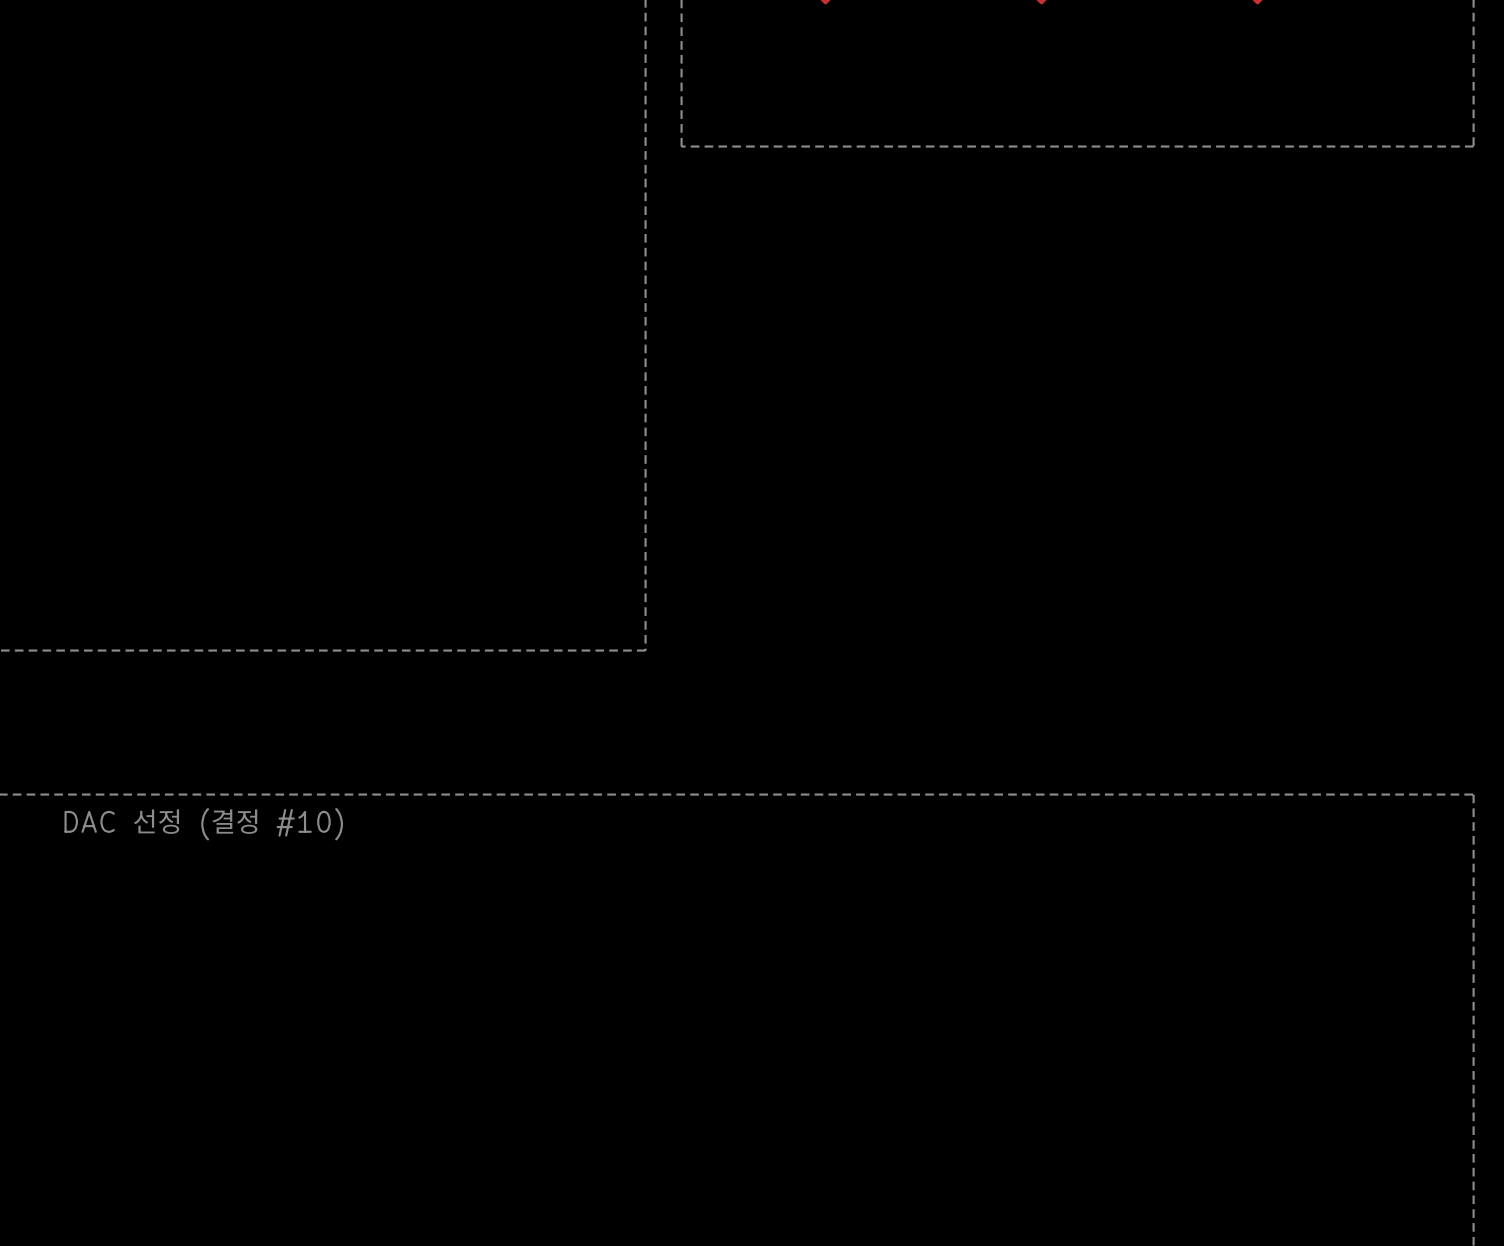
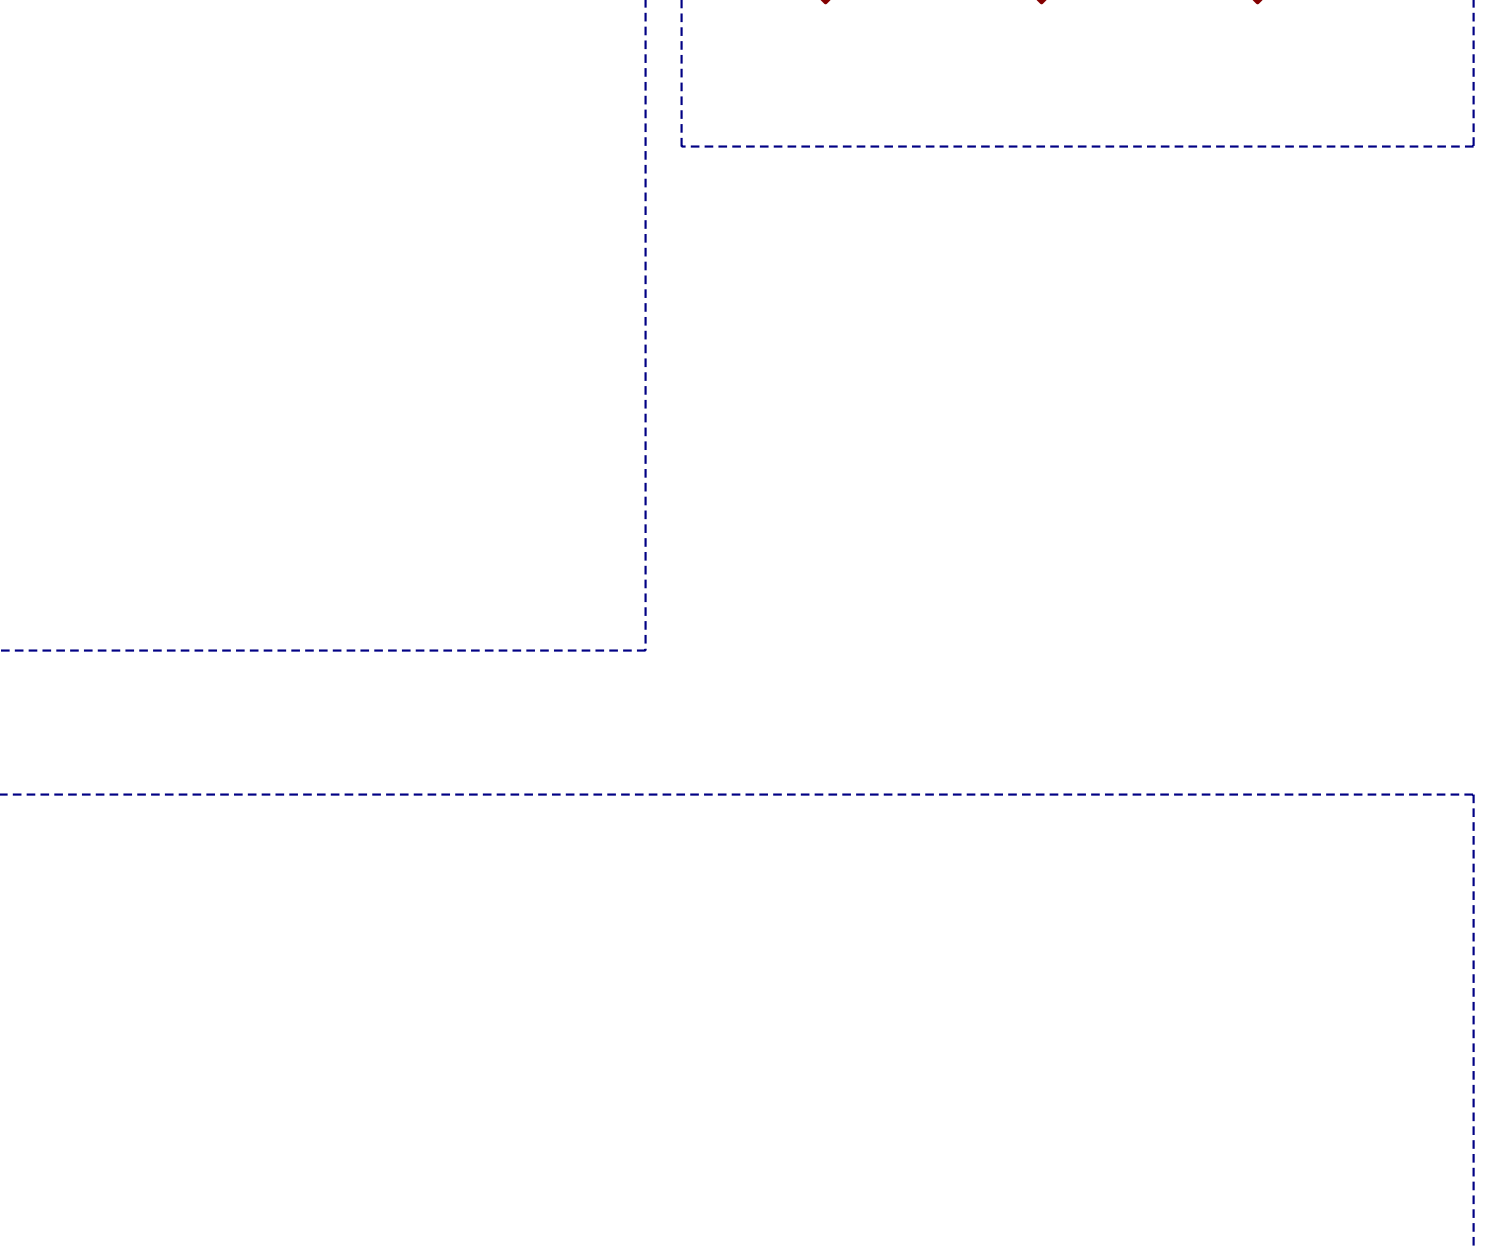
text: DAC 선정 (결정 #10) (203, 824) -> none

